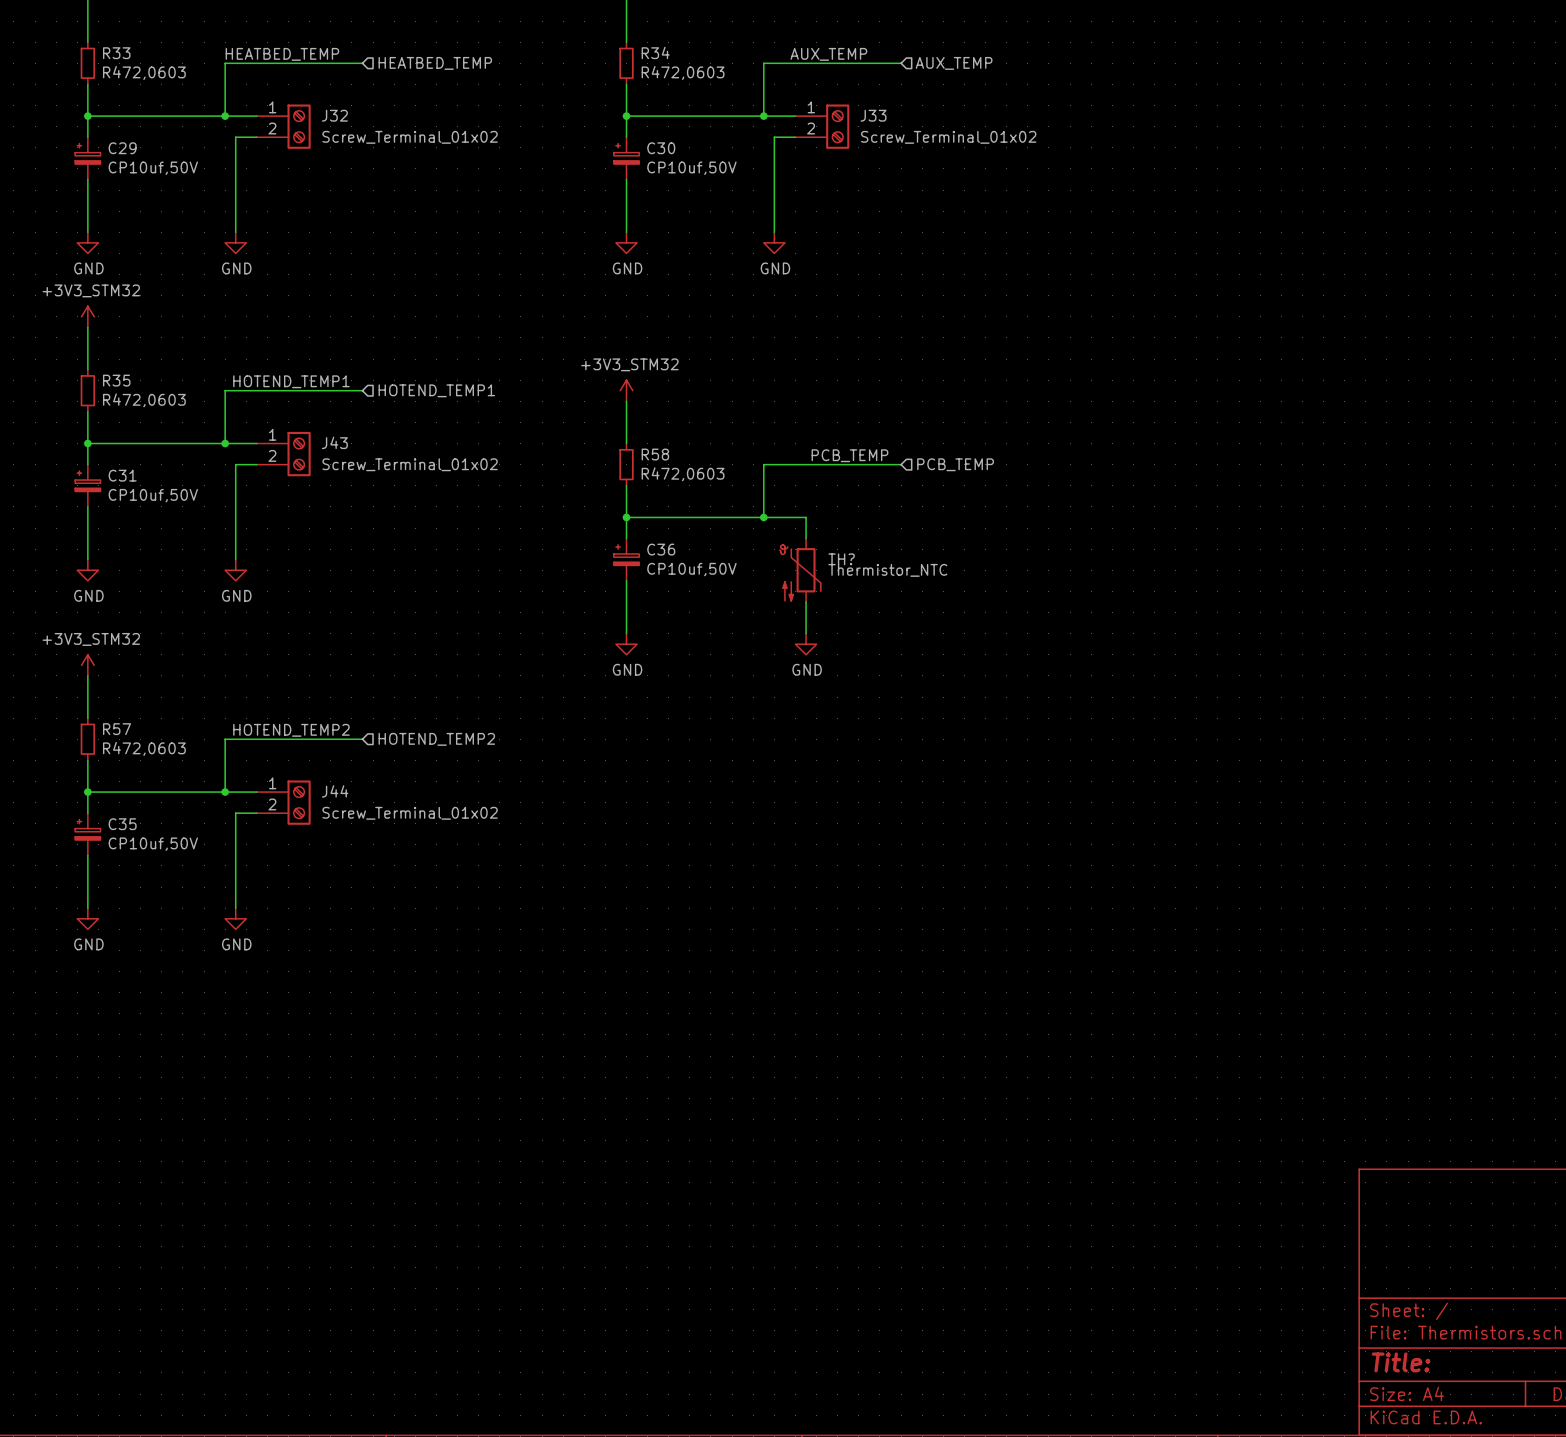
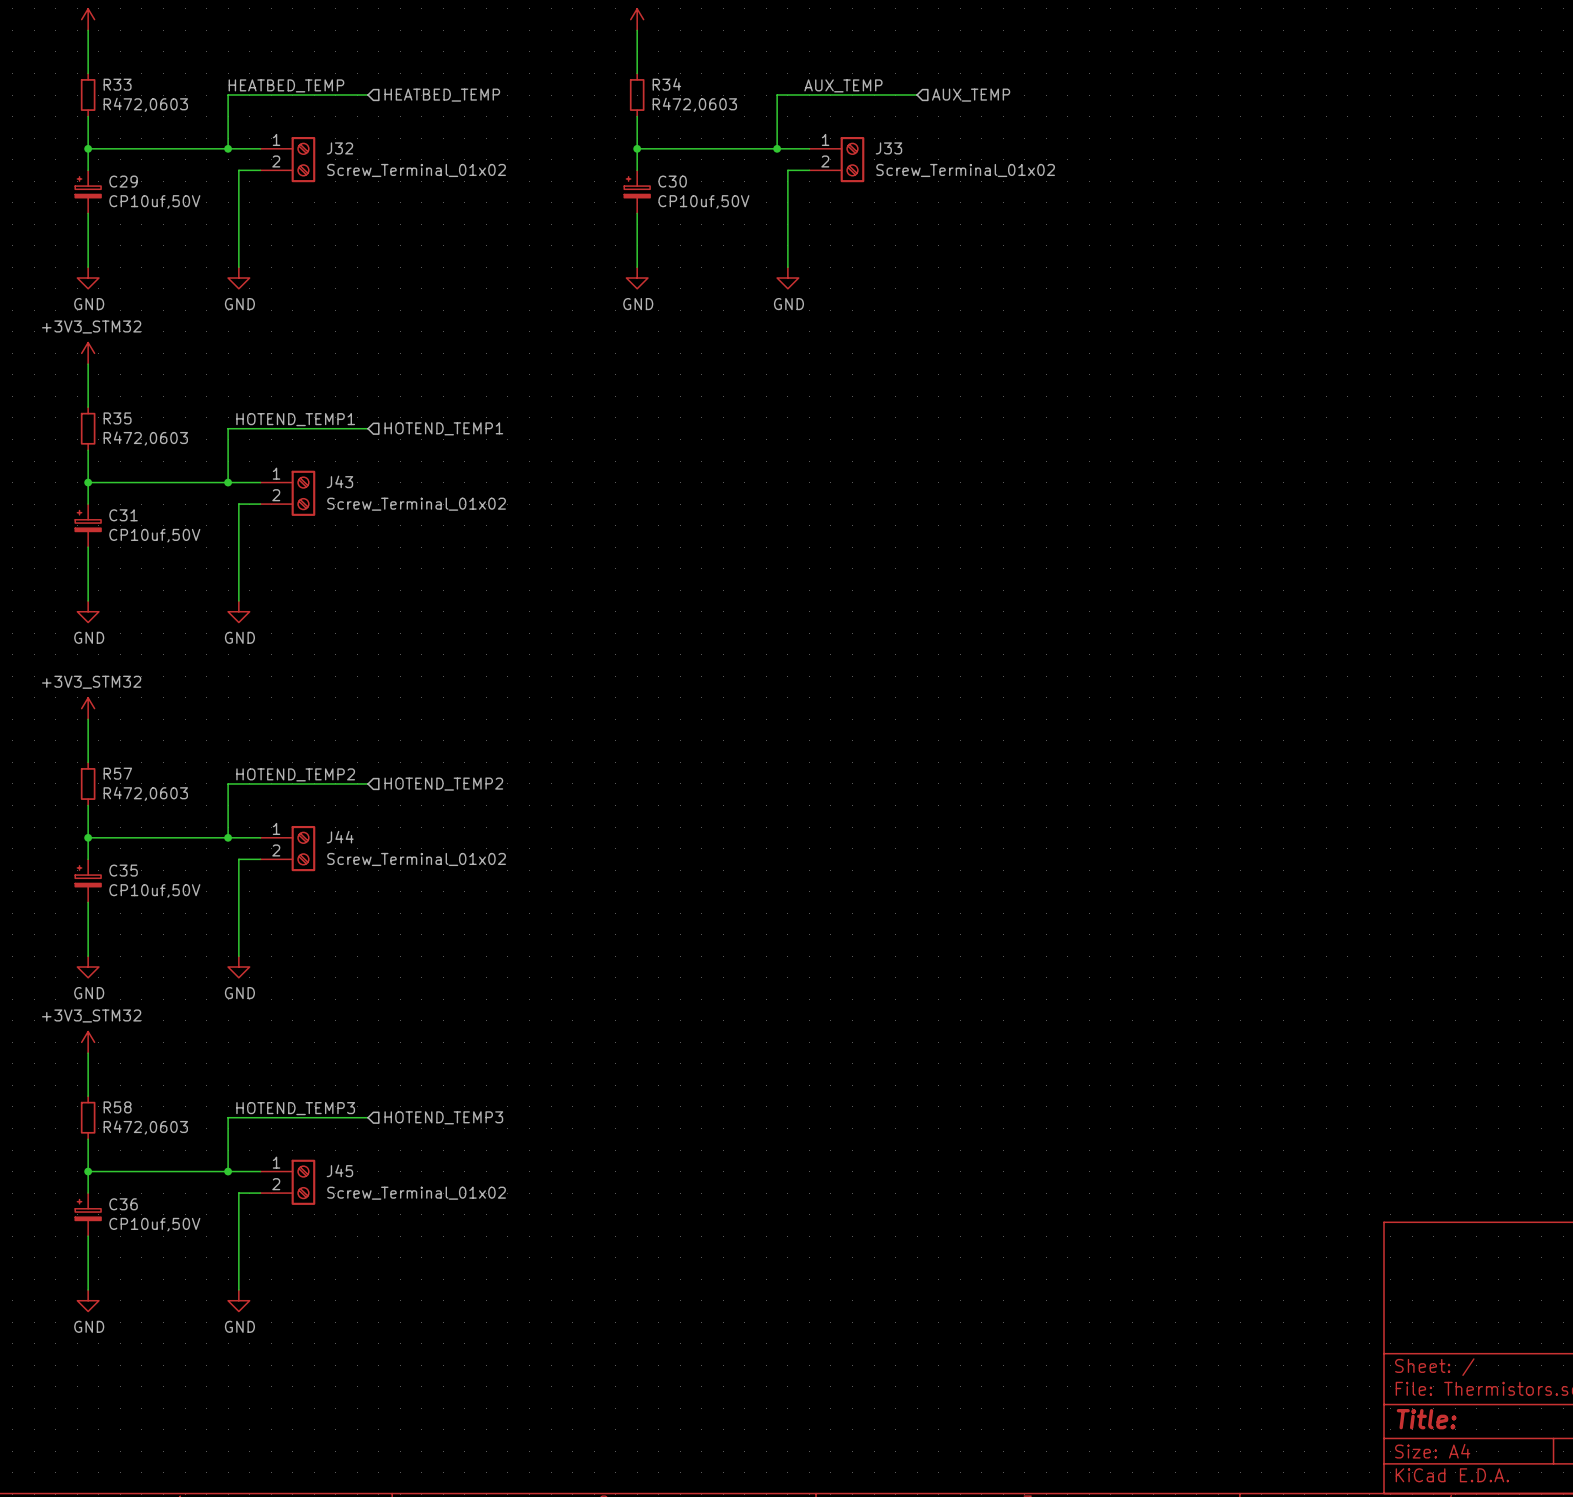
power symbol: +3V3_STM32 (626, 390) -> none
wire: (626, 401) (626, 443) -> none
label: PCB_TEMP (849, 455) -> none
R58 position: (626, 464) -> (88, 1117)
wire: (901, 464) (763, 464) (763, 517) -> none
hierarchical label: PCB_TEMP (955, 464) -> none
wire: (626, 485) (626, 538) -> none
wire: (626, 517) (806, 517) (806, 538) -> none
junction: (626, 517) -> none
junction: (763, 517) -> none
C36 position: (626, 559) -> (88, 1214)
TH?: Thermistor_NTC (800, 570) -> none
wire: (626, 580) (626, 633) -> none
wire: (806, 601) (806, 633) -> none
power symbol: GND (626, 644) -> none
power symbol: GND (806, 644) -> none
power symbol: none -> +3V3_STM32 (88, 1042)
wire: none -> (88, 1053) (88, 1096)
label: none -> HOTEND_TEMP3 (295, 1108)
wire: none -> (368, 1117) (228, 1117) (228, 1171)
hierarchical label: none -> HOTEND_TEMP3 (443, 1117)
wire: none -> (88, 1139) (88, 1193)
wire: none -> (88, 1171) (260, 1171)
junction: none -> (88, 1171)
junction: none -> (228, 1171)
J45: none -> Screw_Terminal_01x02 (287, 1182)
wire: none -> (260, 1193) (238, 1193) (238, 1289)
wire: none -> (88, 1236) (88, 1289)
power symbol: none -> GND (88, 1300)
power symbol: none -> GND (238, 1300)

